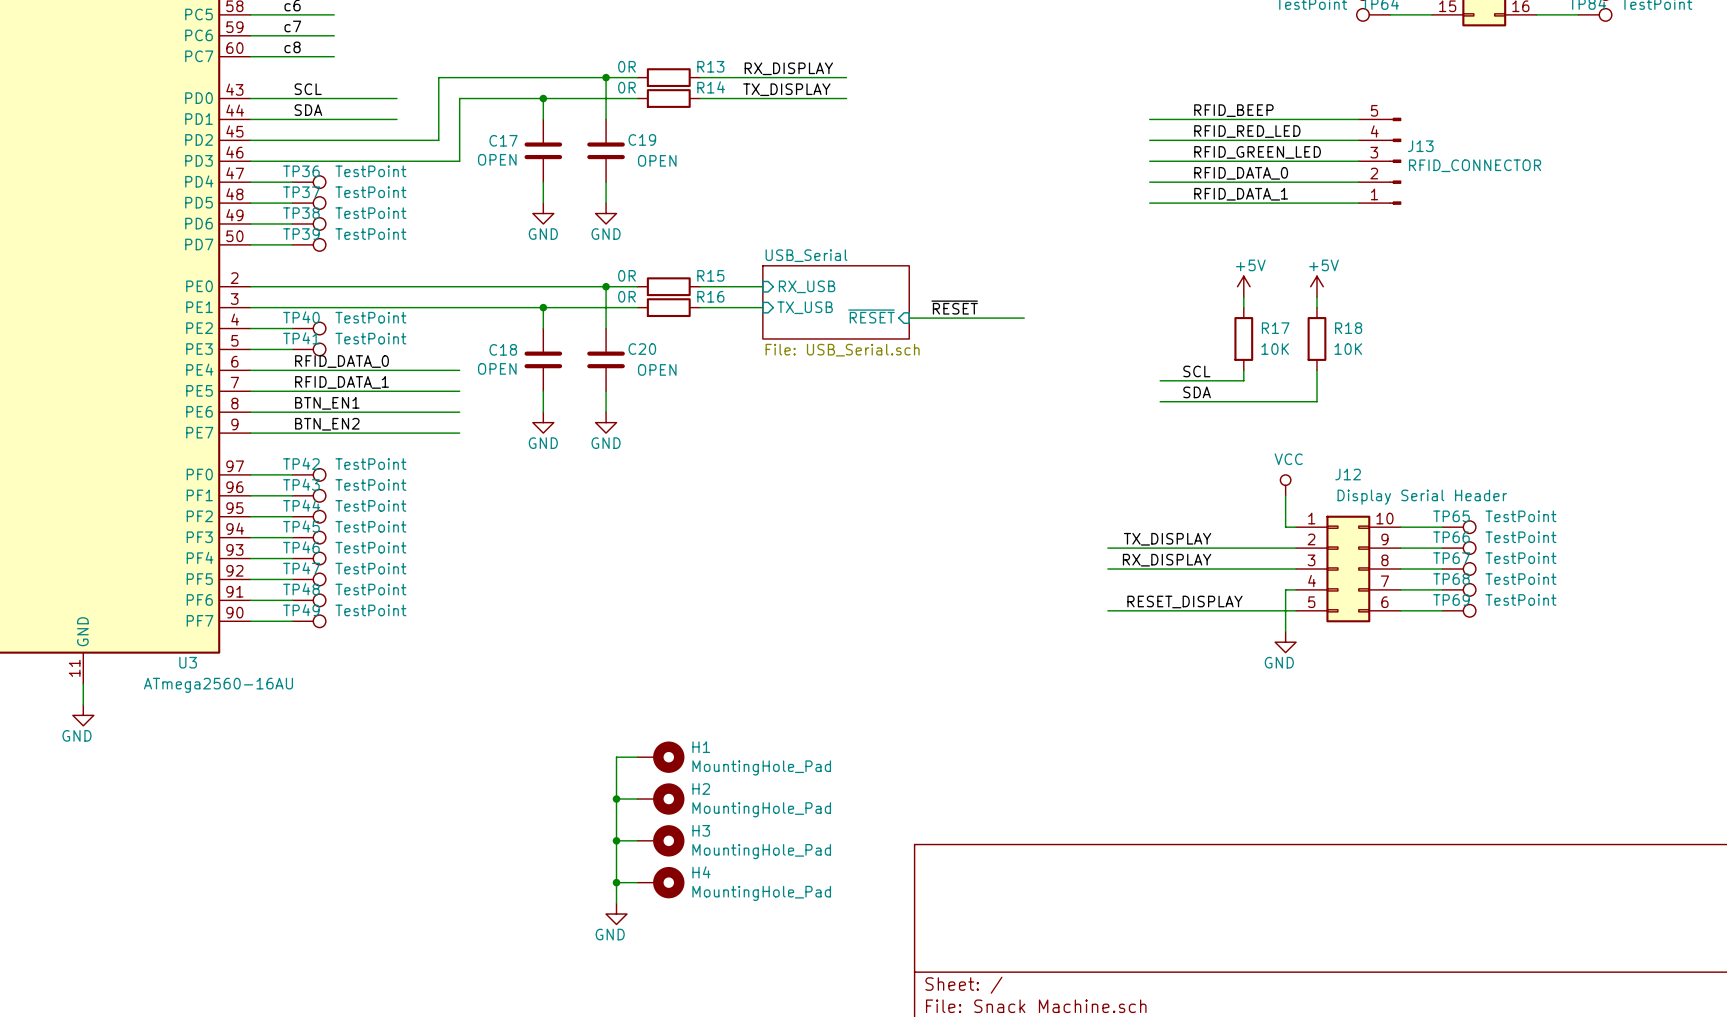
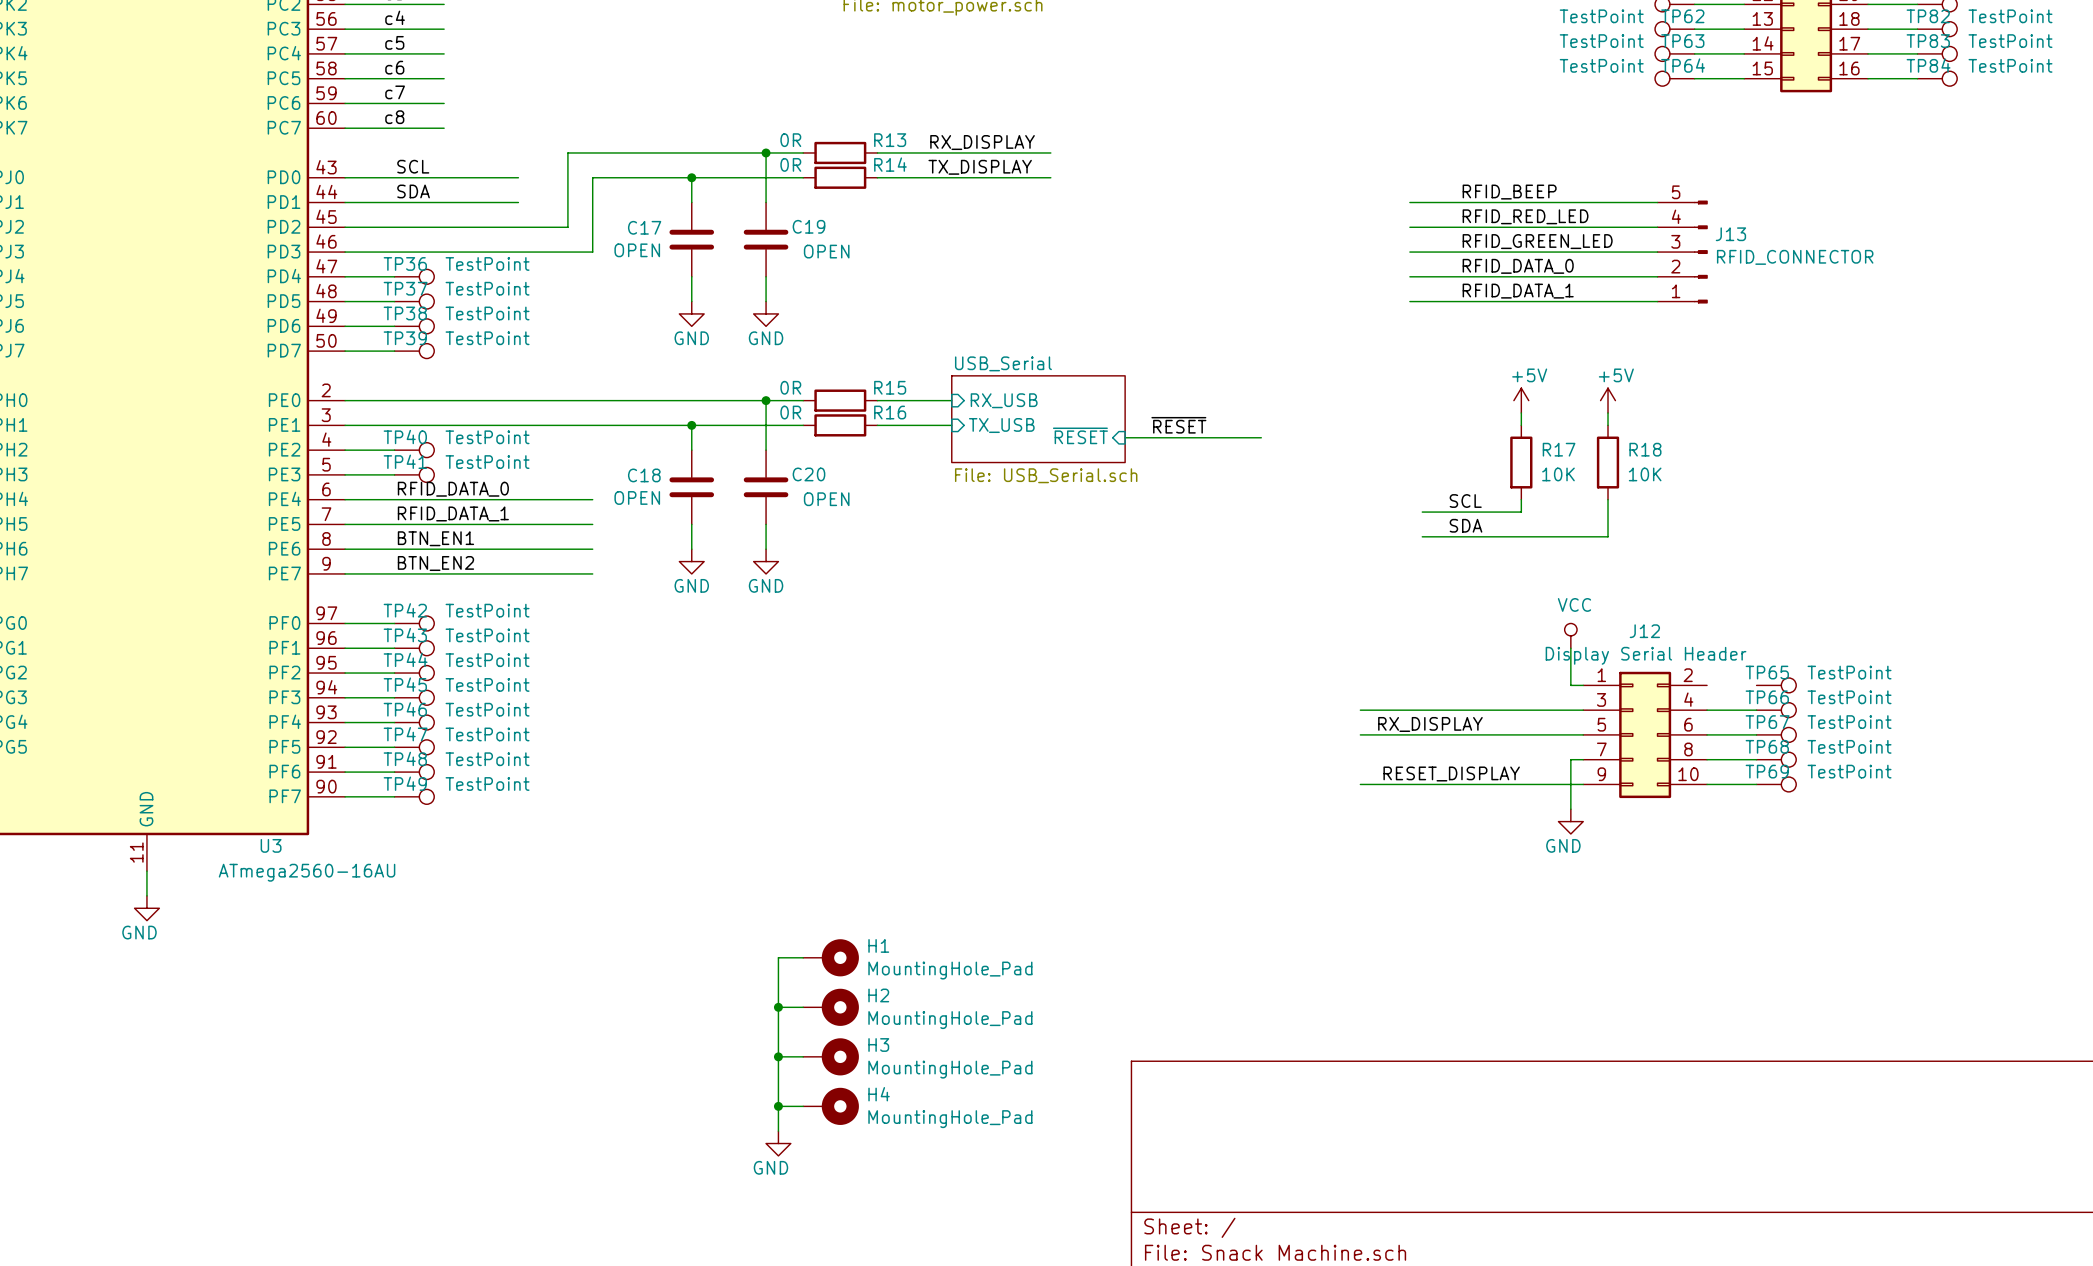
J12 value position: Display Serial Header (1422, 497) -> Display Serial Header (1646, 655)
J12 symbol: [1296, 515, 1401, 623] -> [1583, 671, 1708, 799]
wire: (1400, 527) (1442, 527) -> none
label: TX_DISPLAY (1167, 539) -> none

